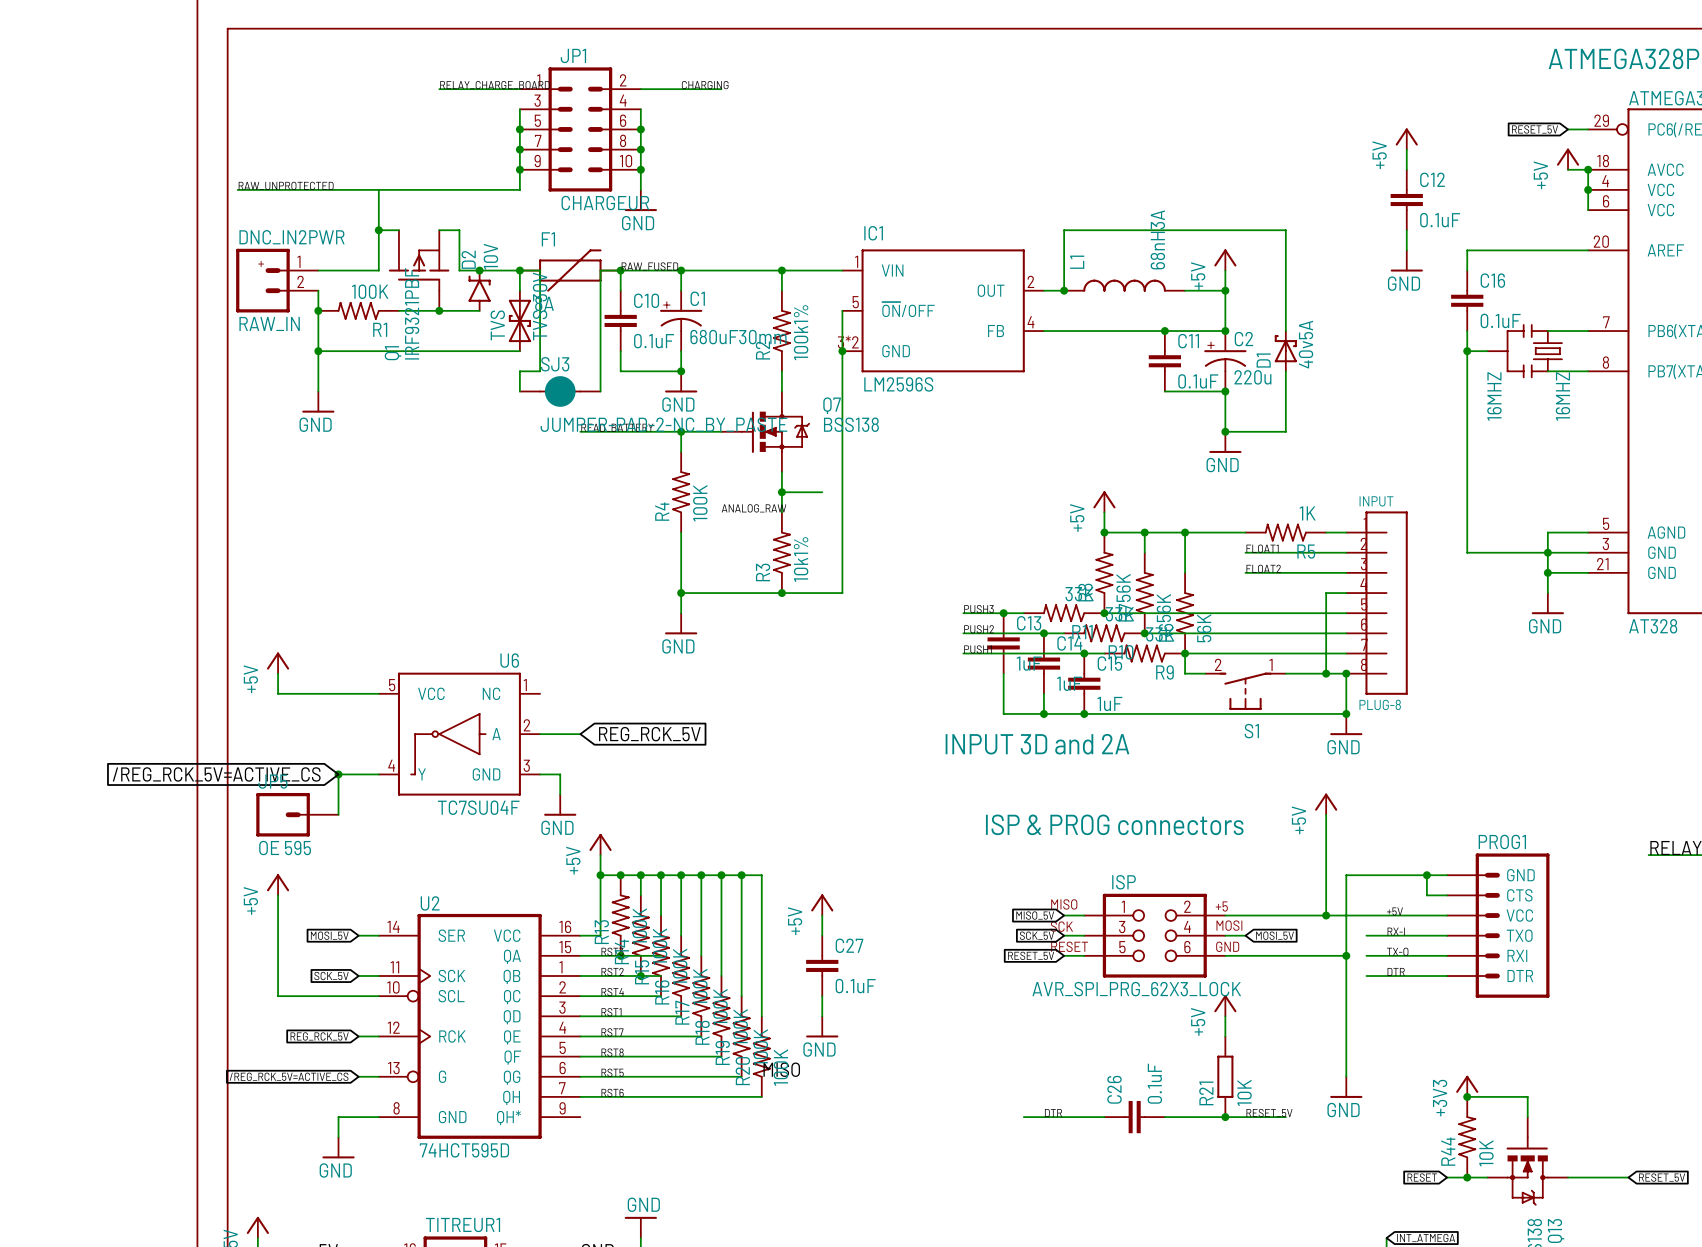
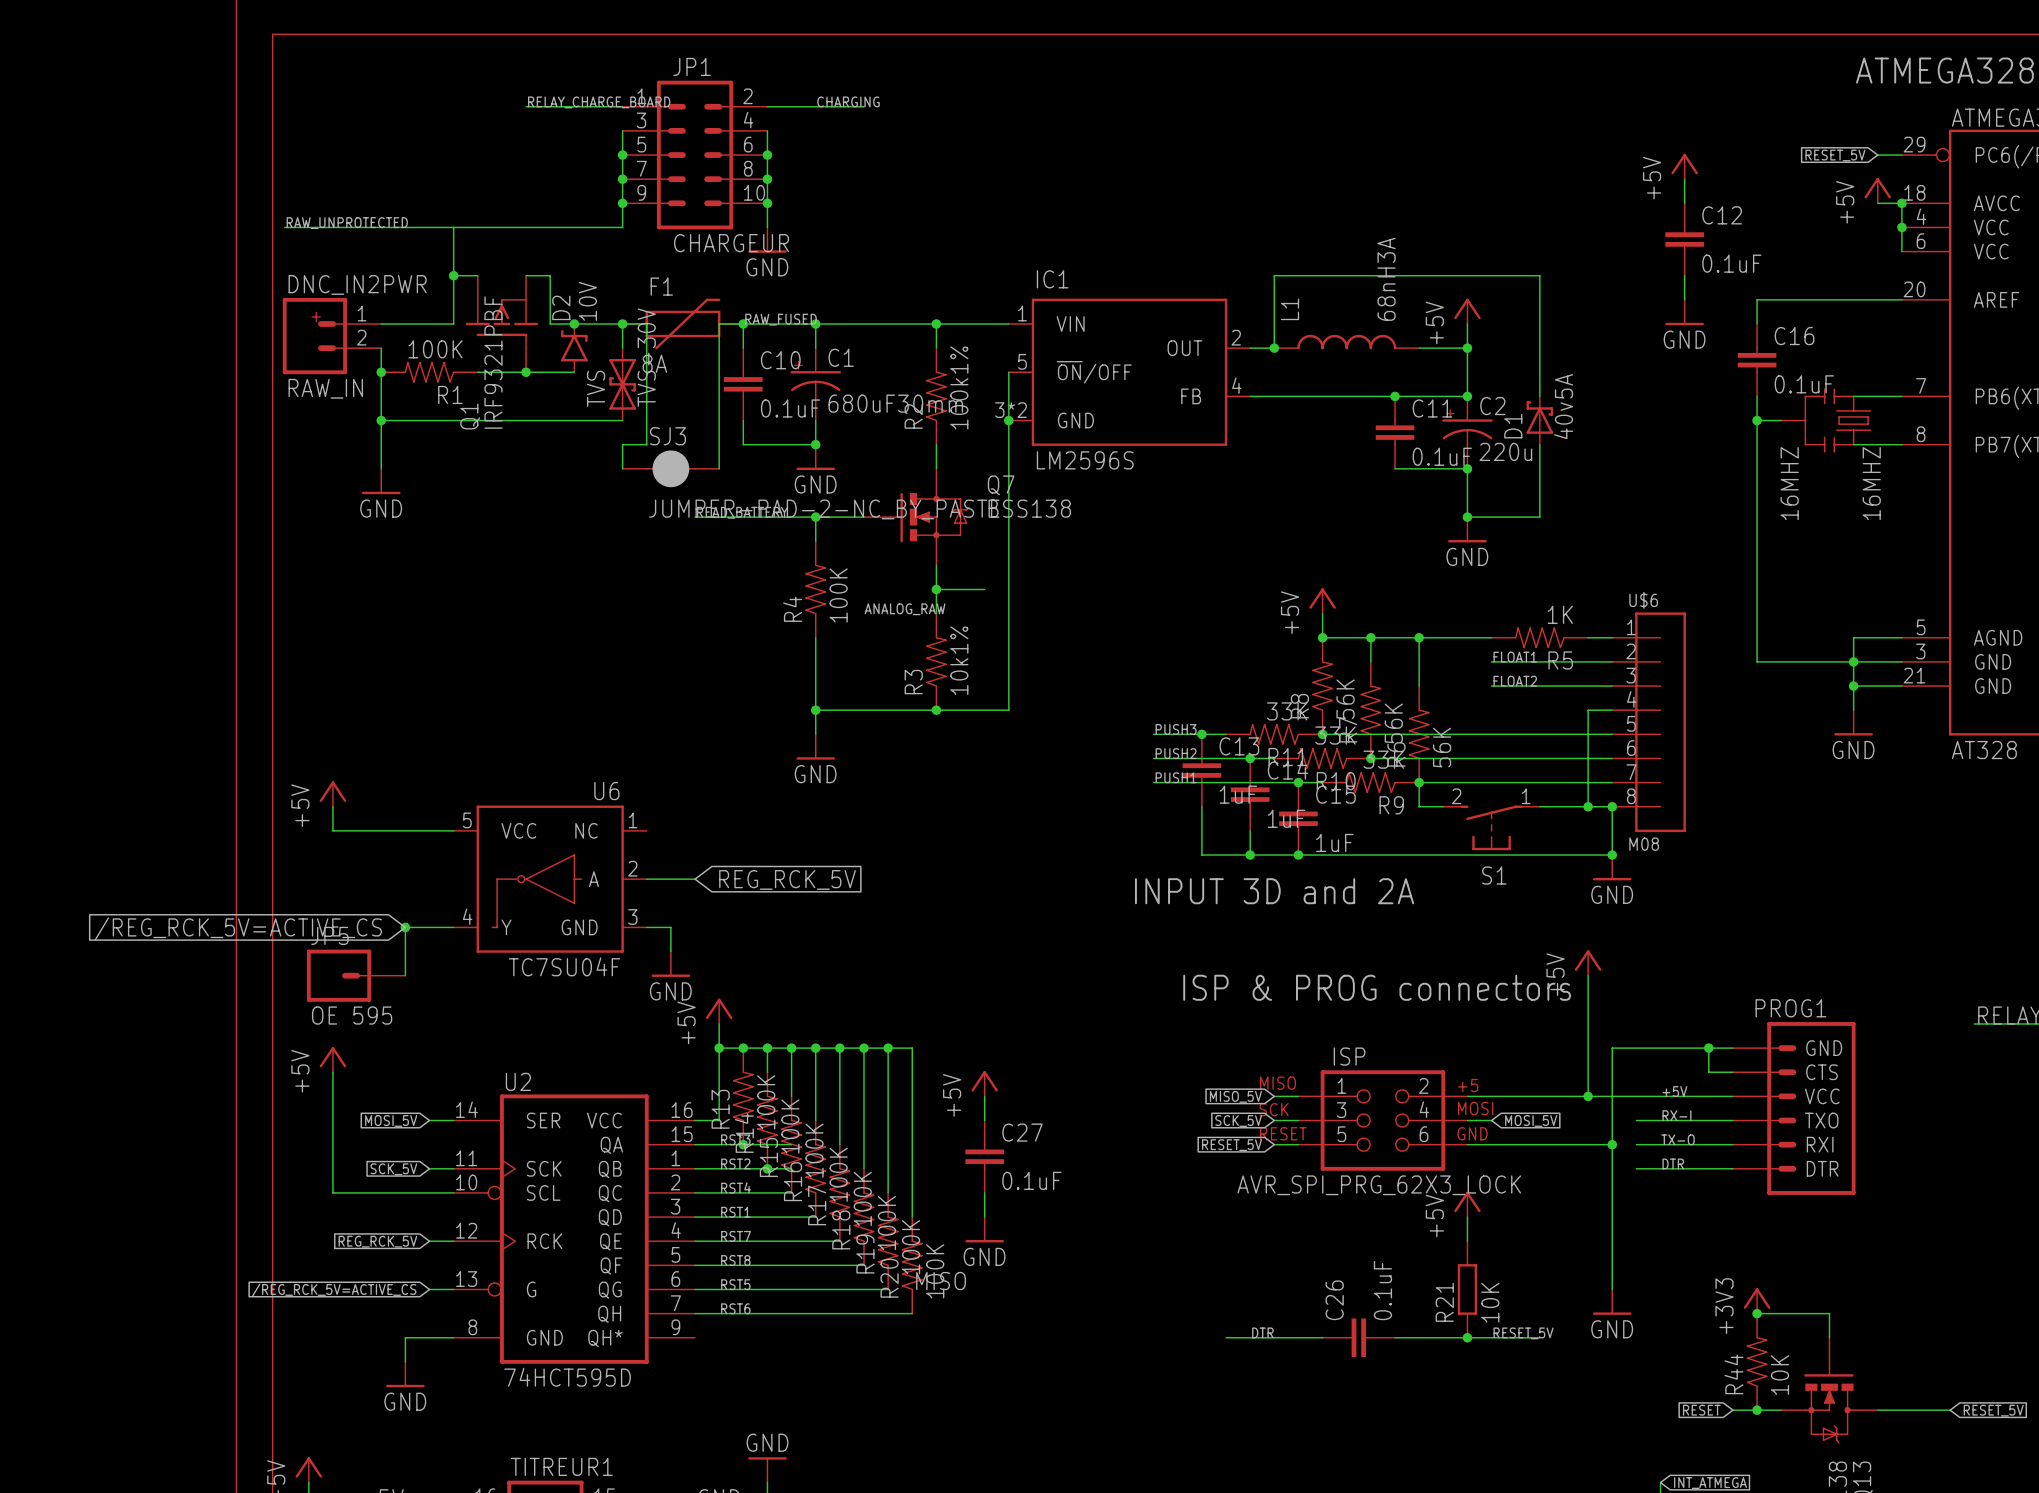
INPUT name: INPUT (1376, 501) -> U$6 (1643, 600)
INPUT value: PLUG-8 (1380, 704) -> M08 (1644, 844)

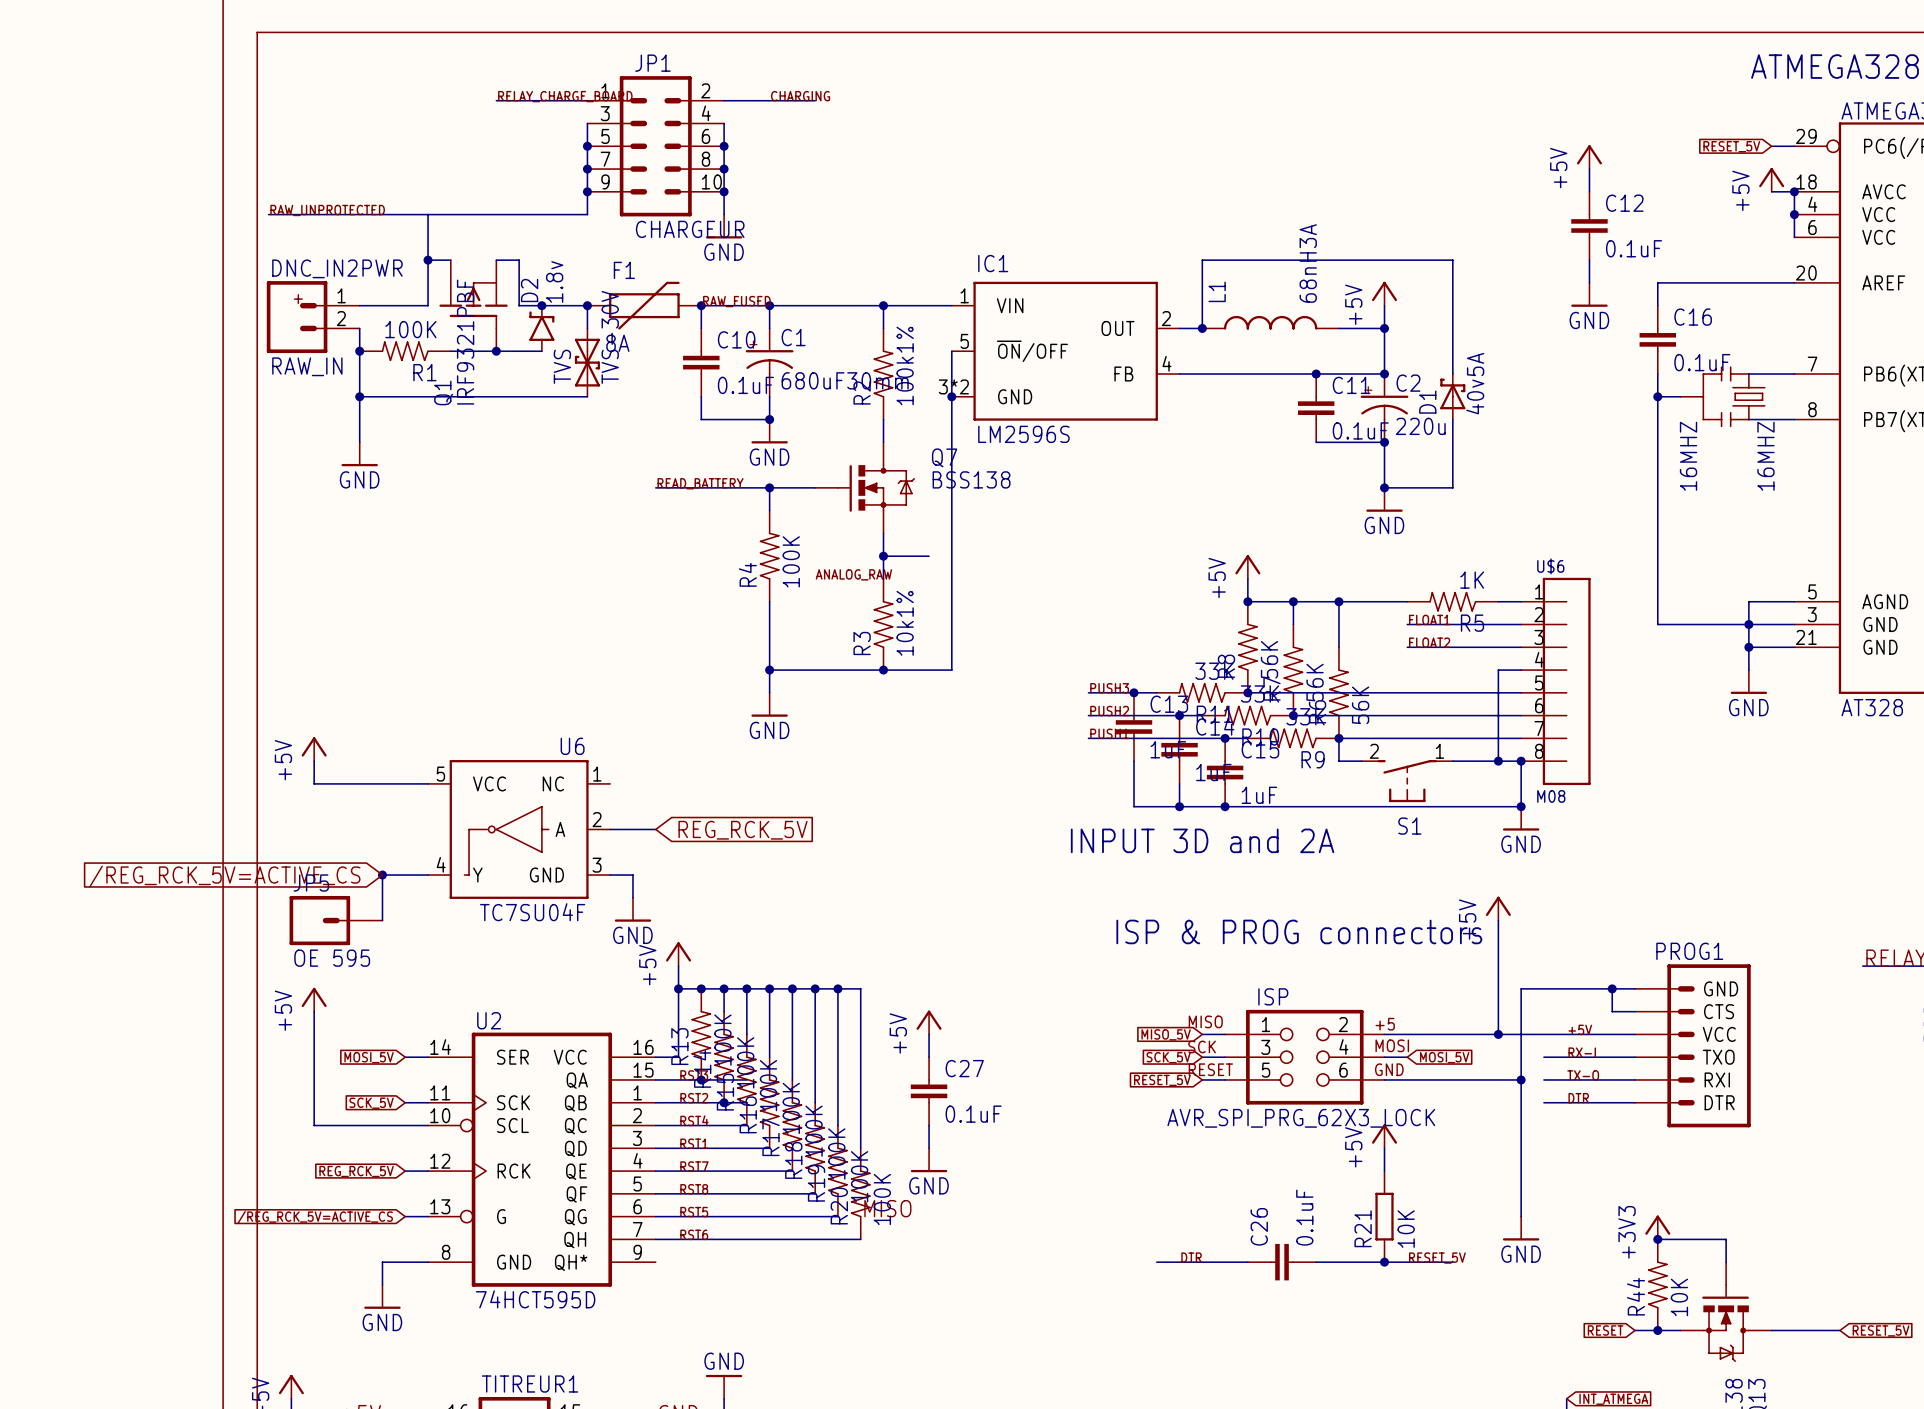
D2 value: 10V (587, 301) -> 1.8v (554, 281)
wire: (622, 323) (646, 323) (646, 444) (622, 444) (622, 468) -> none
wire: (743, 323) (719, 323) (719, 468) -> none
SJ3: JUMPER-PAD-2-NC_BY_PASTE (670, 468) -> none

